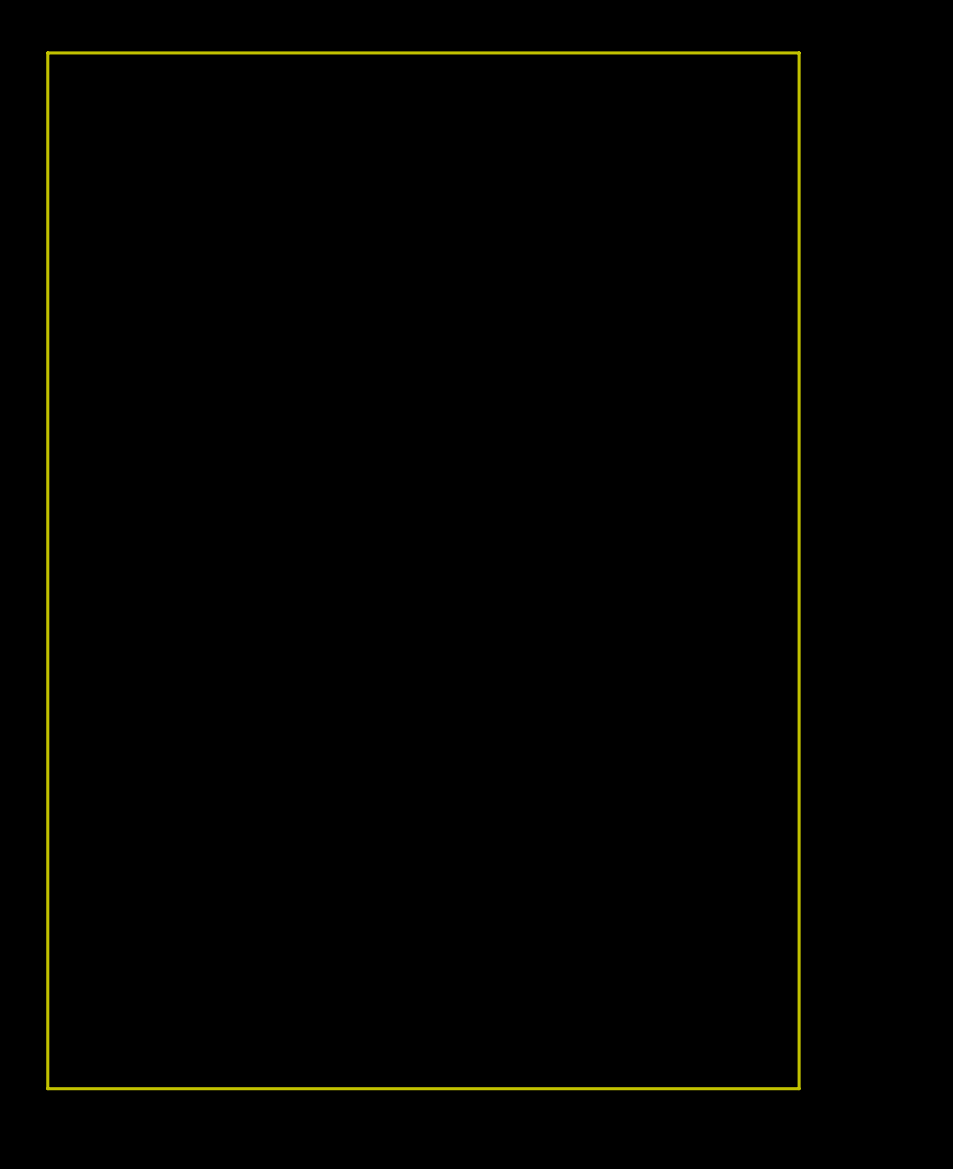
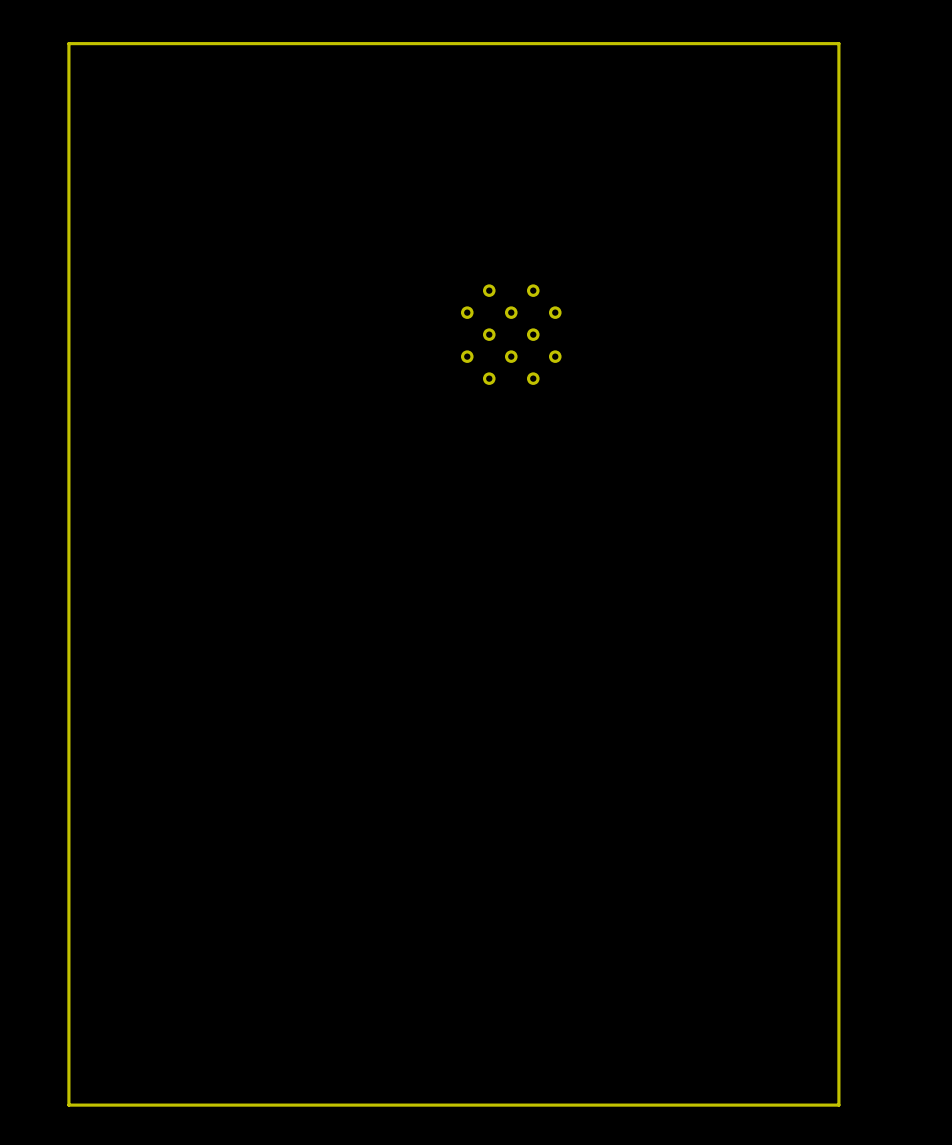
part: none -> (511, 334)

